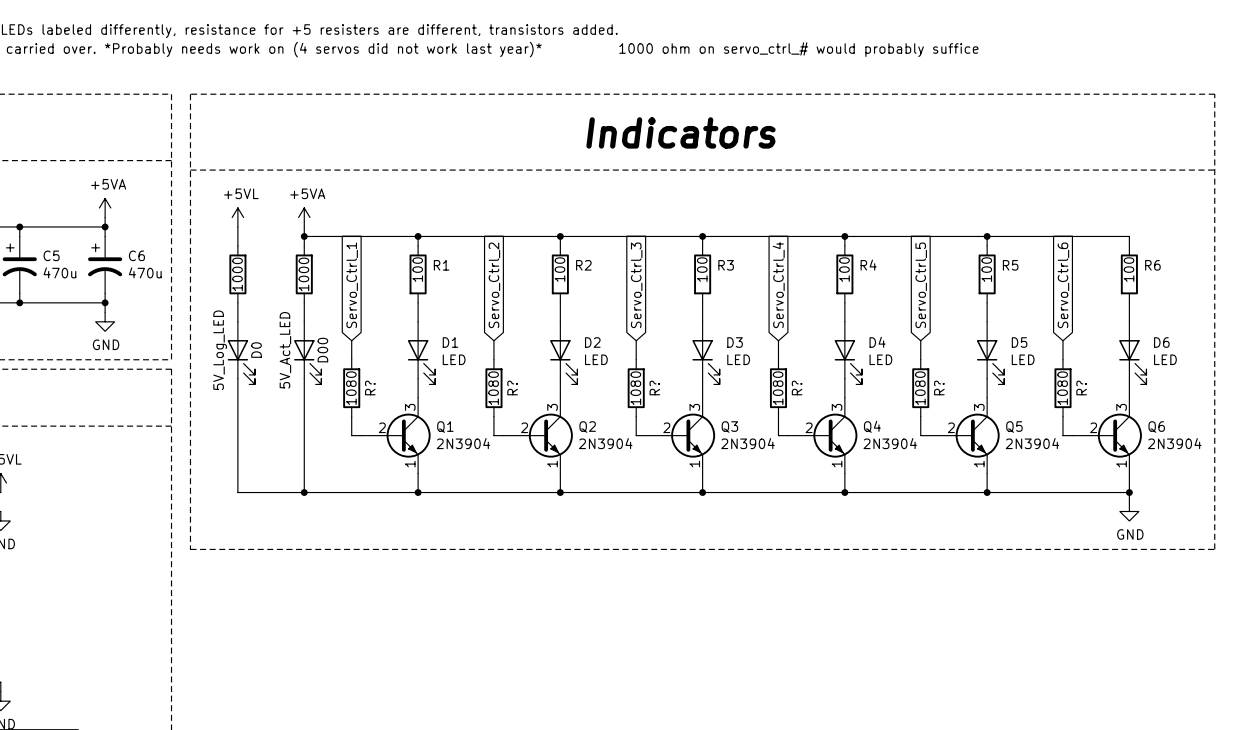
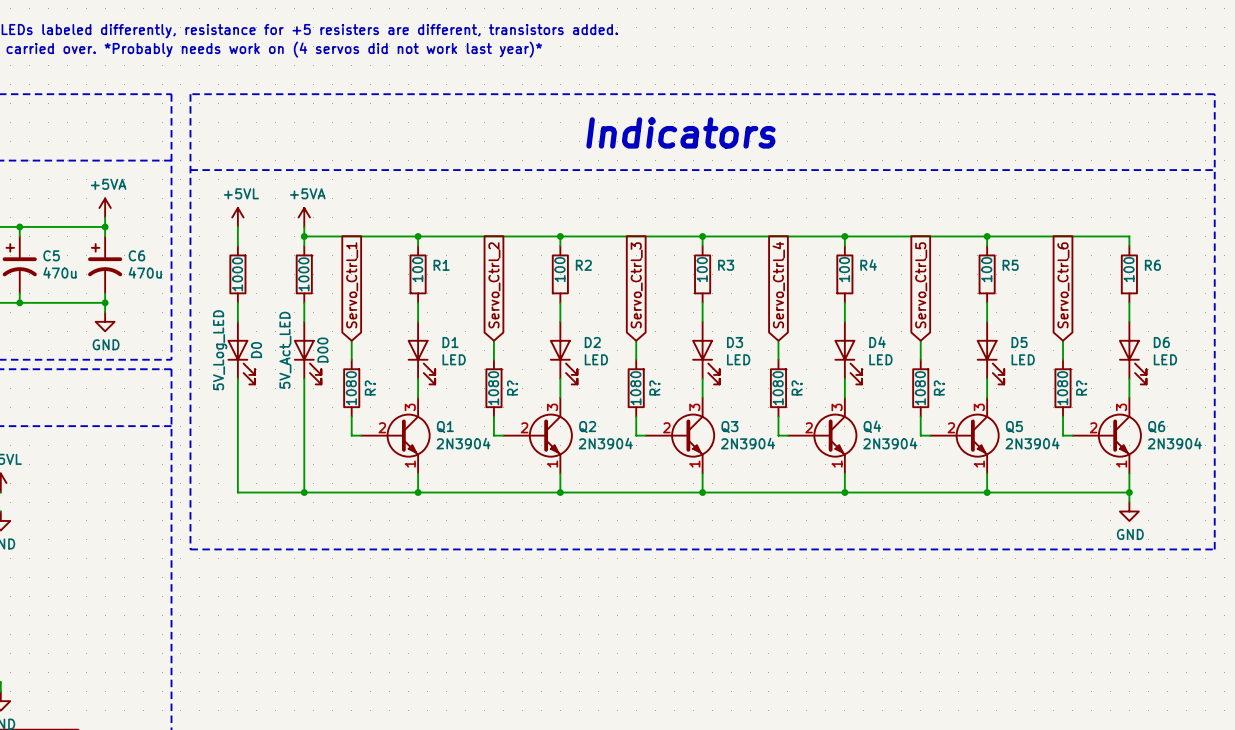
text: 1000 ohm on servo_ctrl_# would probably suffice (798, 49) -> none

